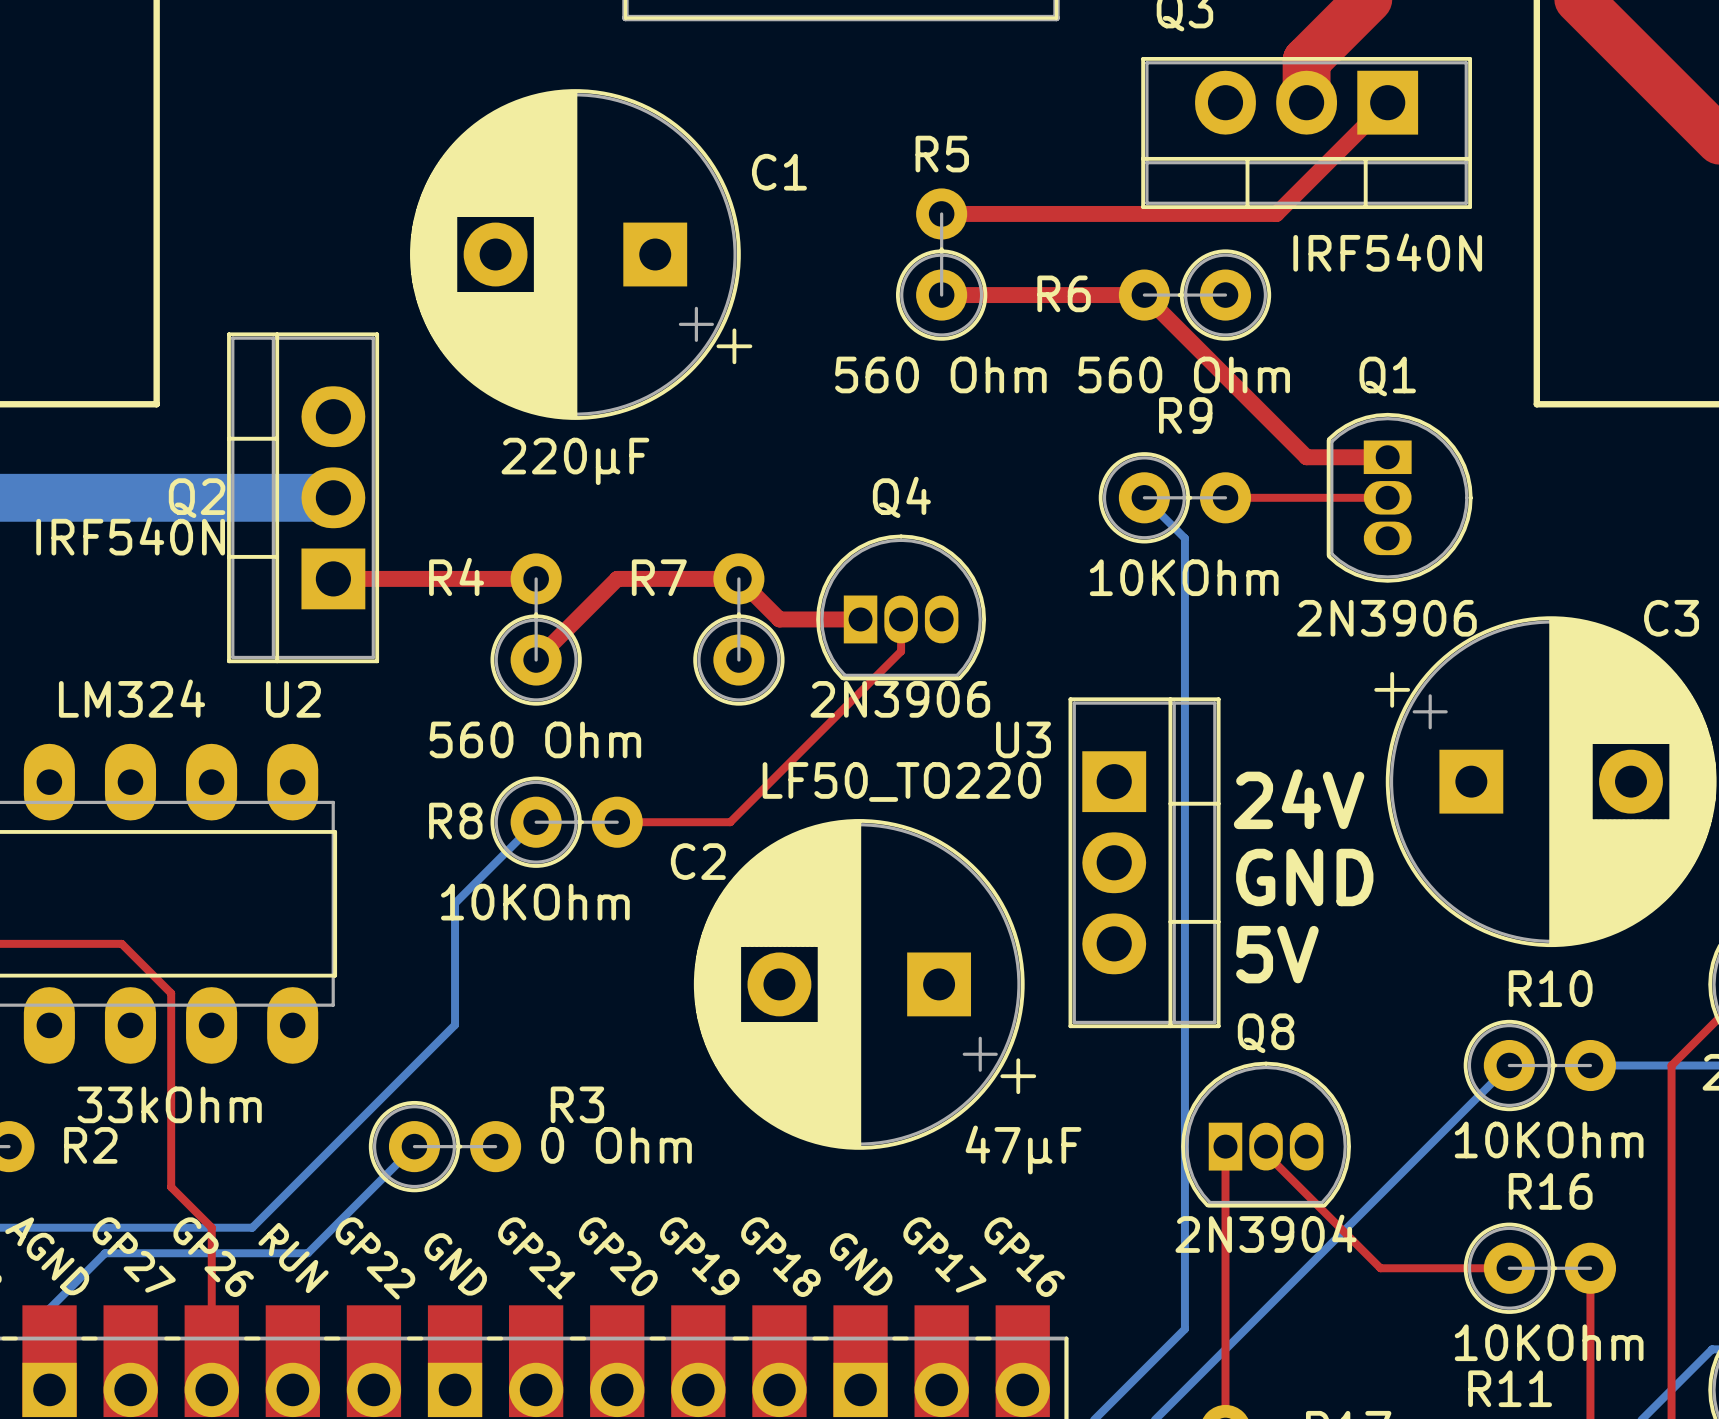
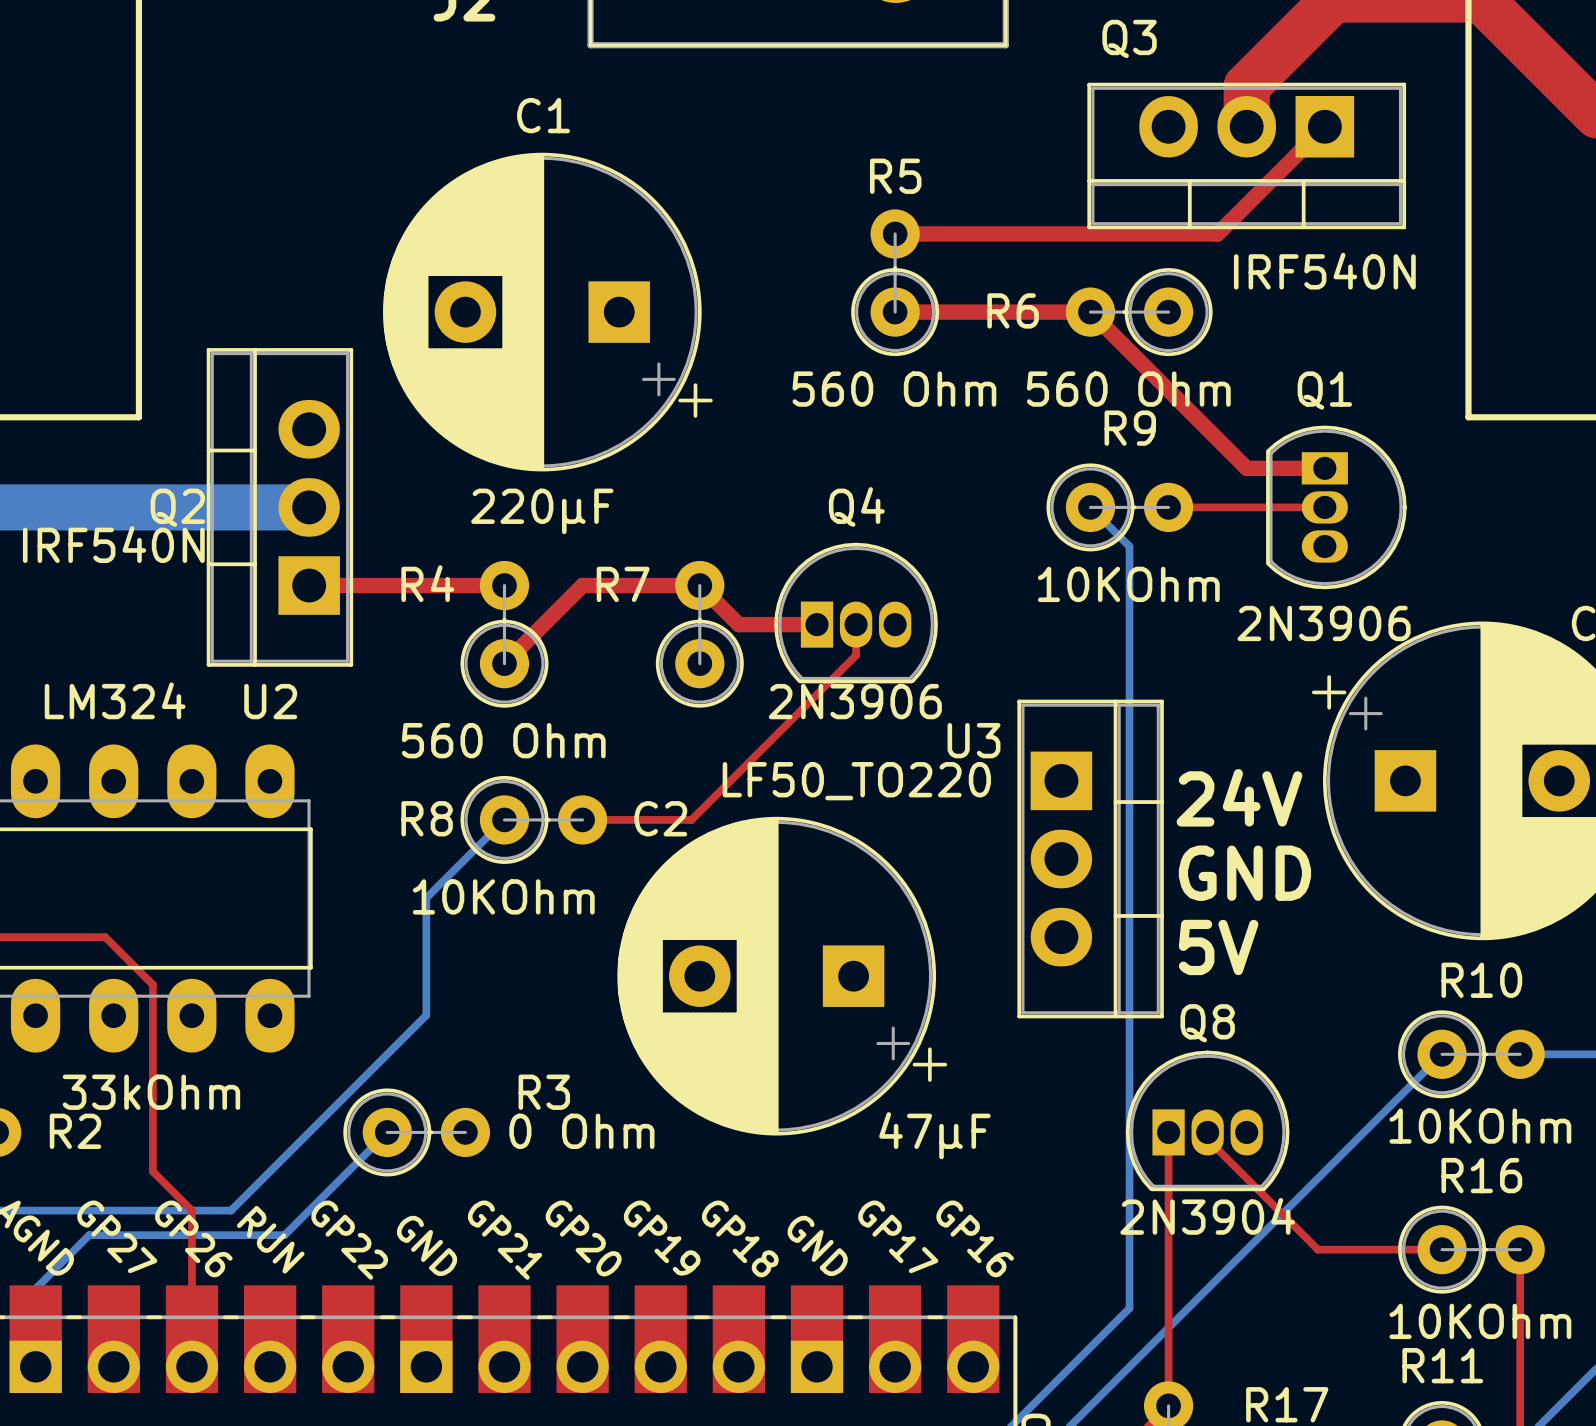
C1 name position: C1 (779, 172) -> C1 (543, 115)
C1 position: (581, 254) -> (547, 312)
C2 name position: C2 (698, 861) -> C2 (660, 818)
C2 position: (865, 984) -> (782, 976)

